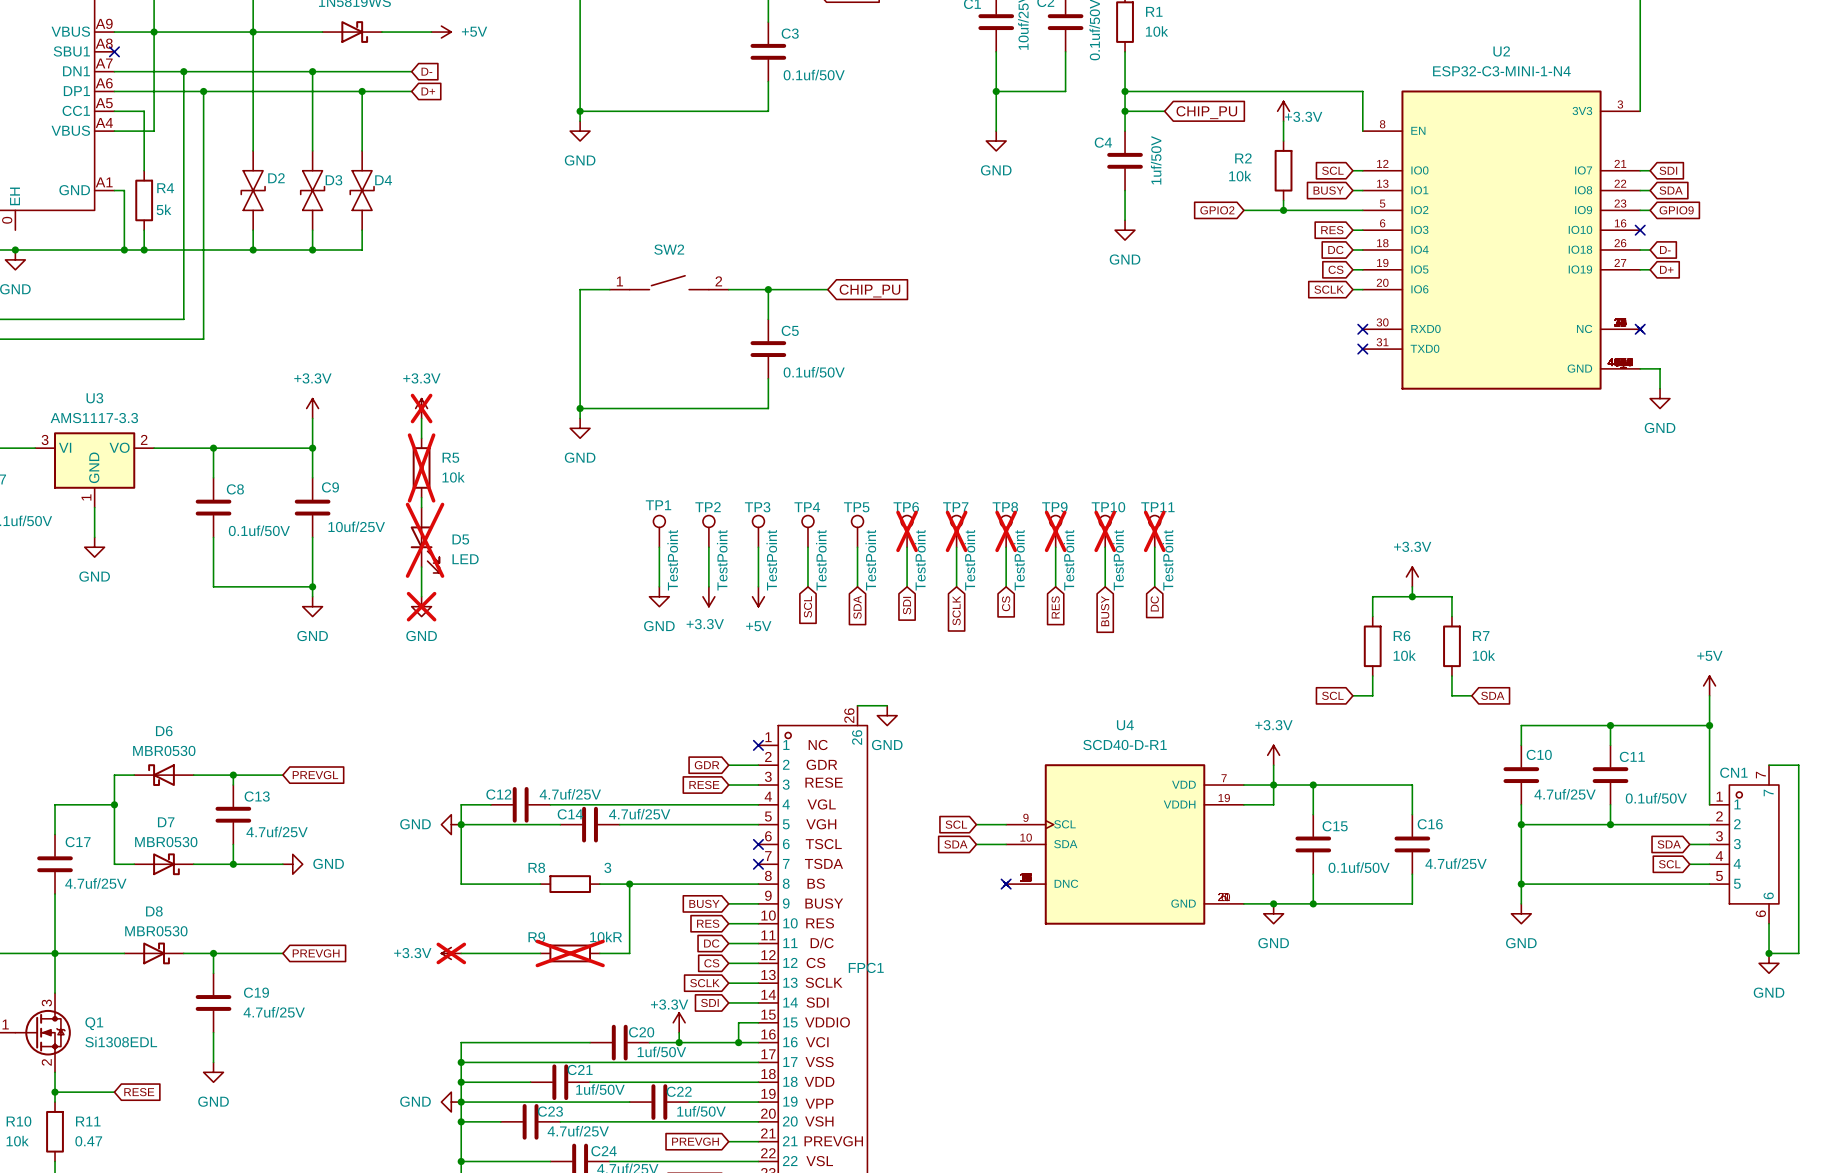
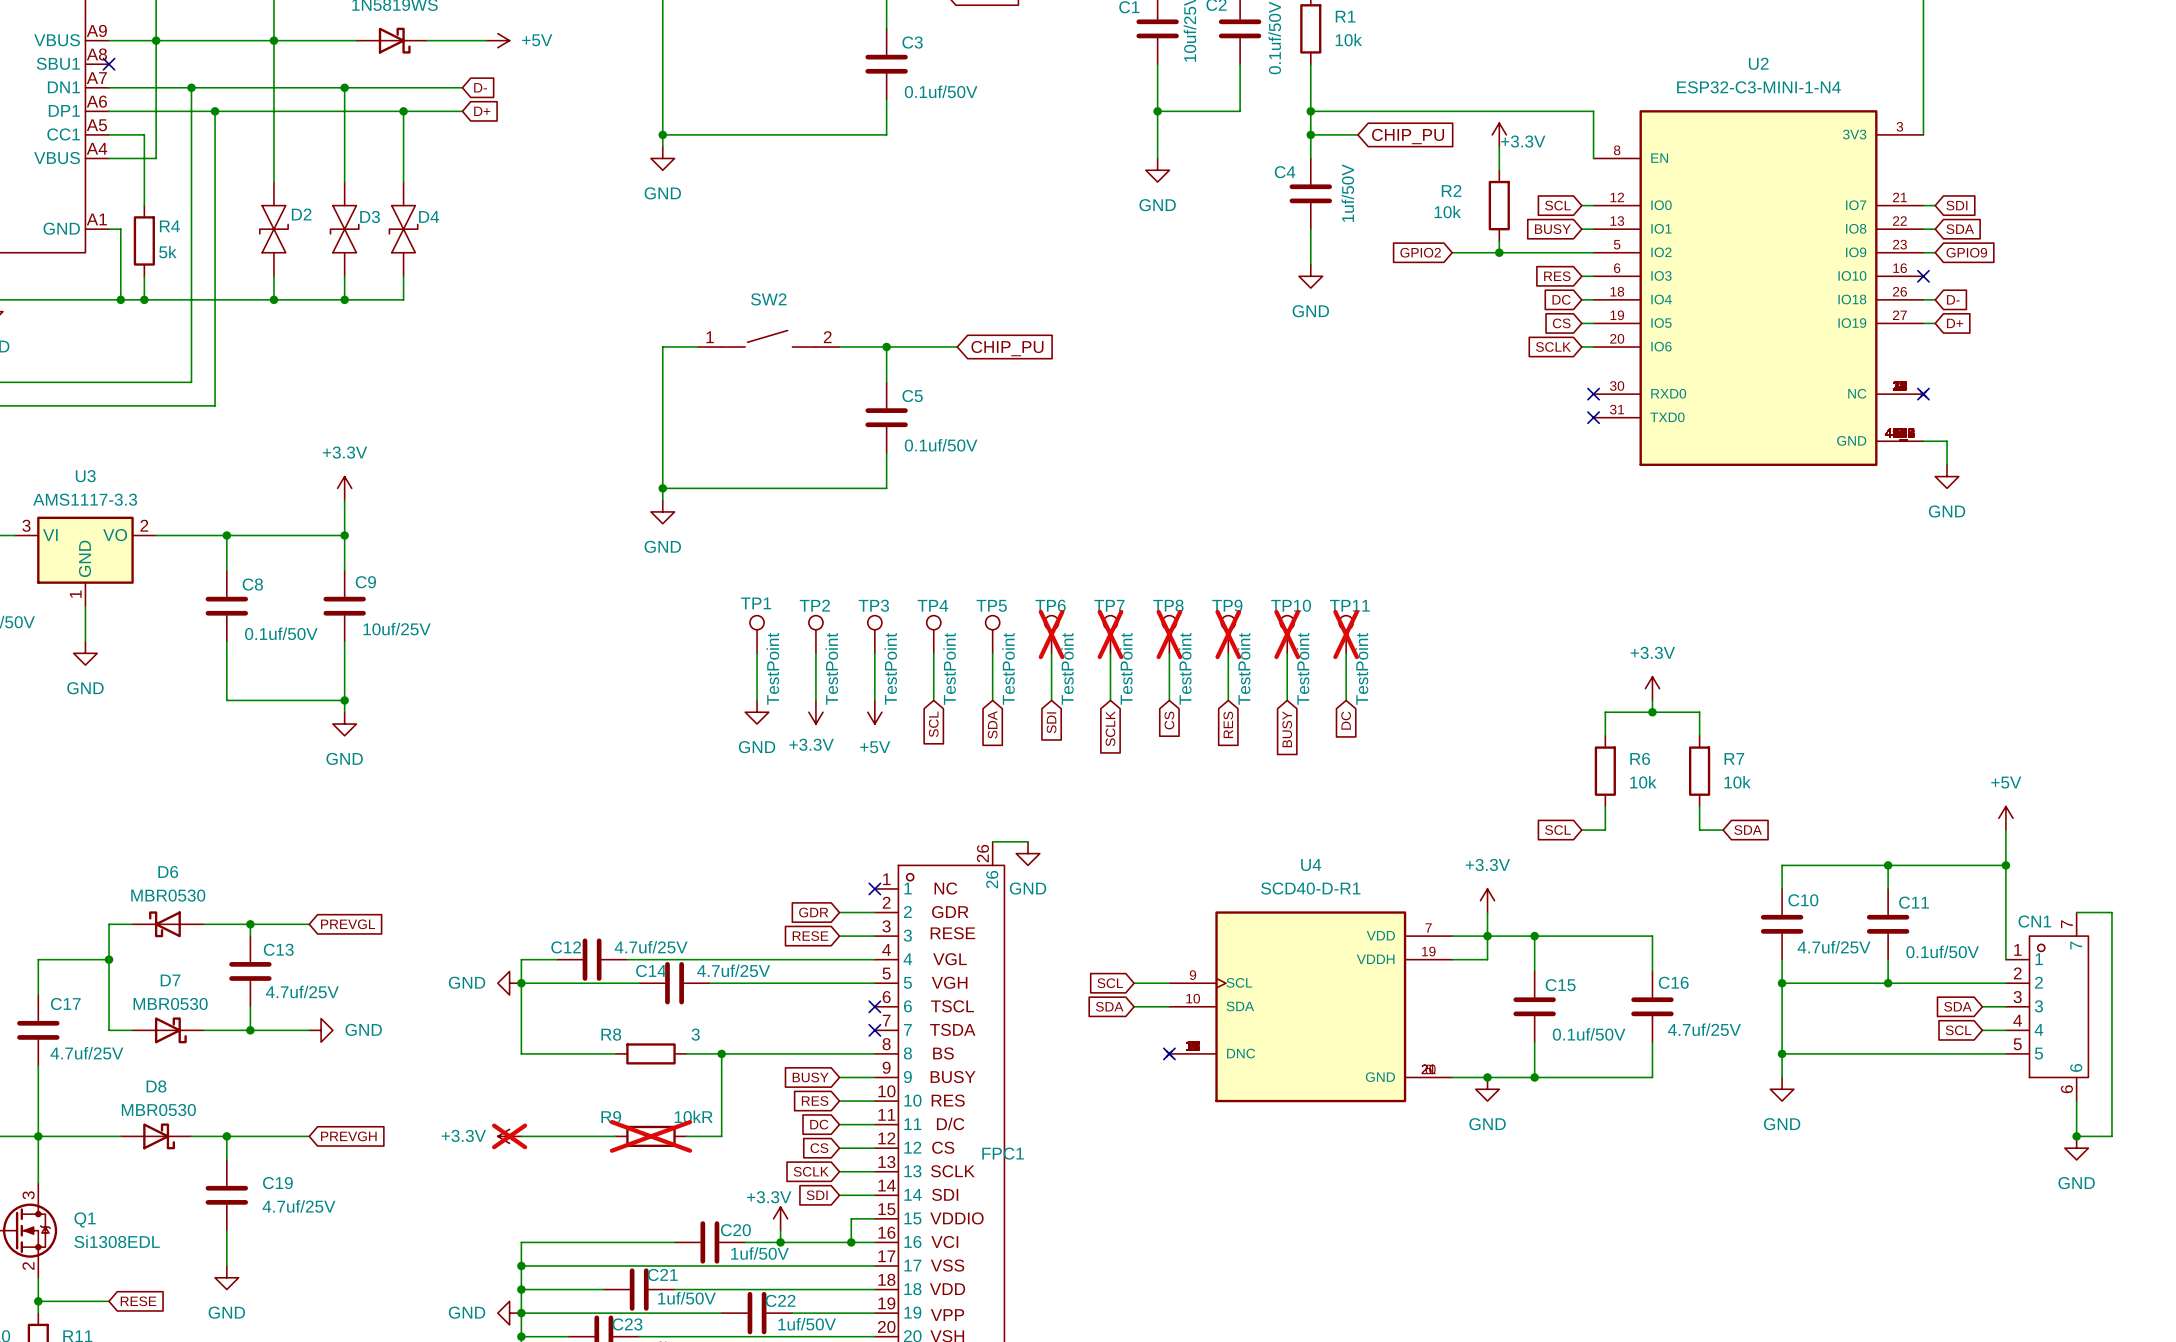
power symbol: +3.3V (421, 408) -> none
wire: (421, 418) (421, 438) -> none
R5: 10k (421, 467) -> none
wire: (421, 497) (421, 507) -> none
D5: LED (425, 540) -> none
wire: (421, 567) (421, 596) -> none
power symbol: GND (421, 606) -> none

